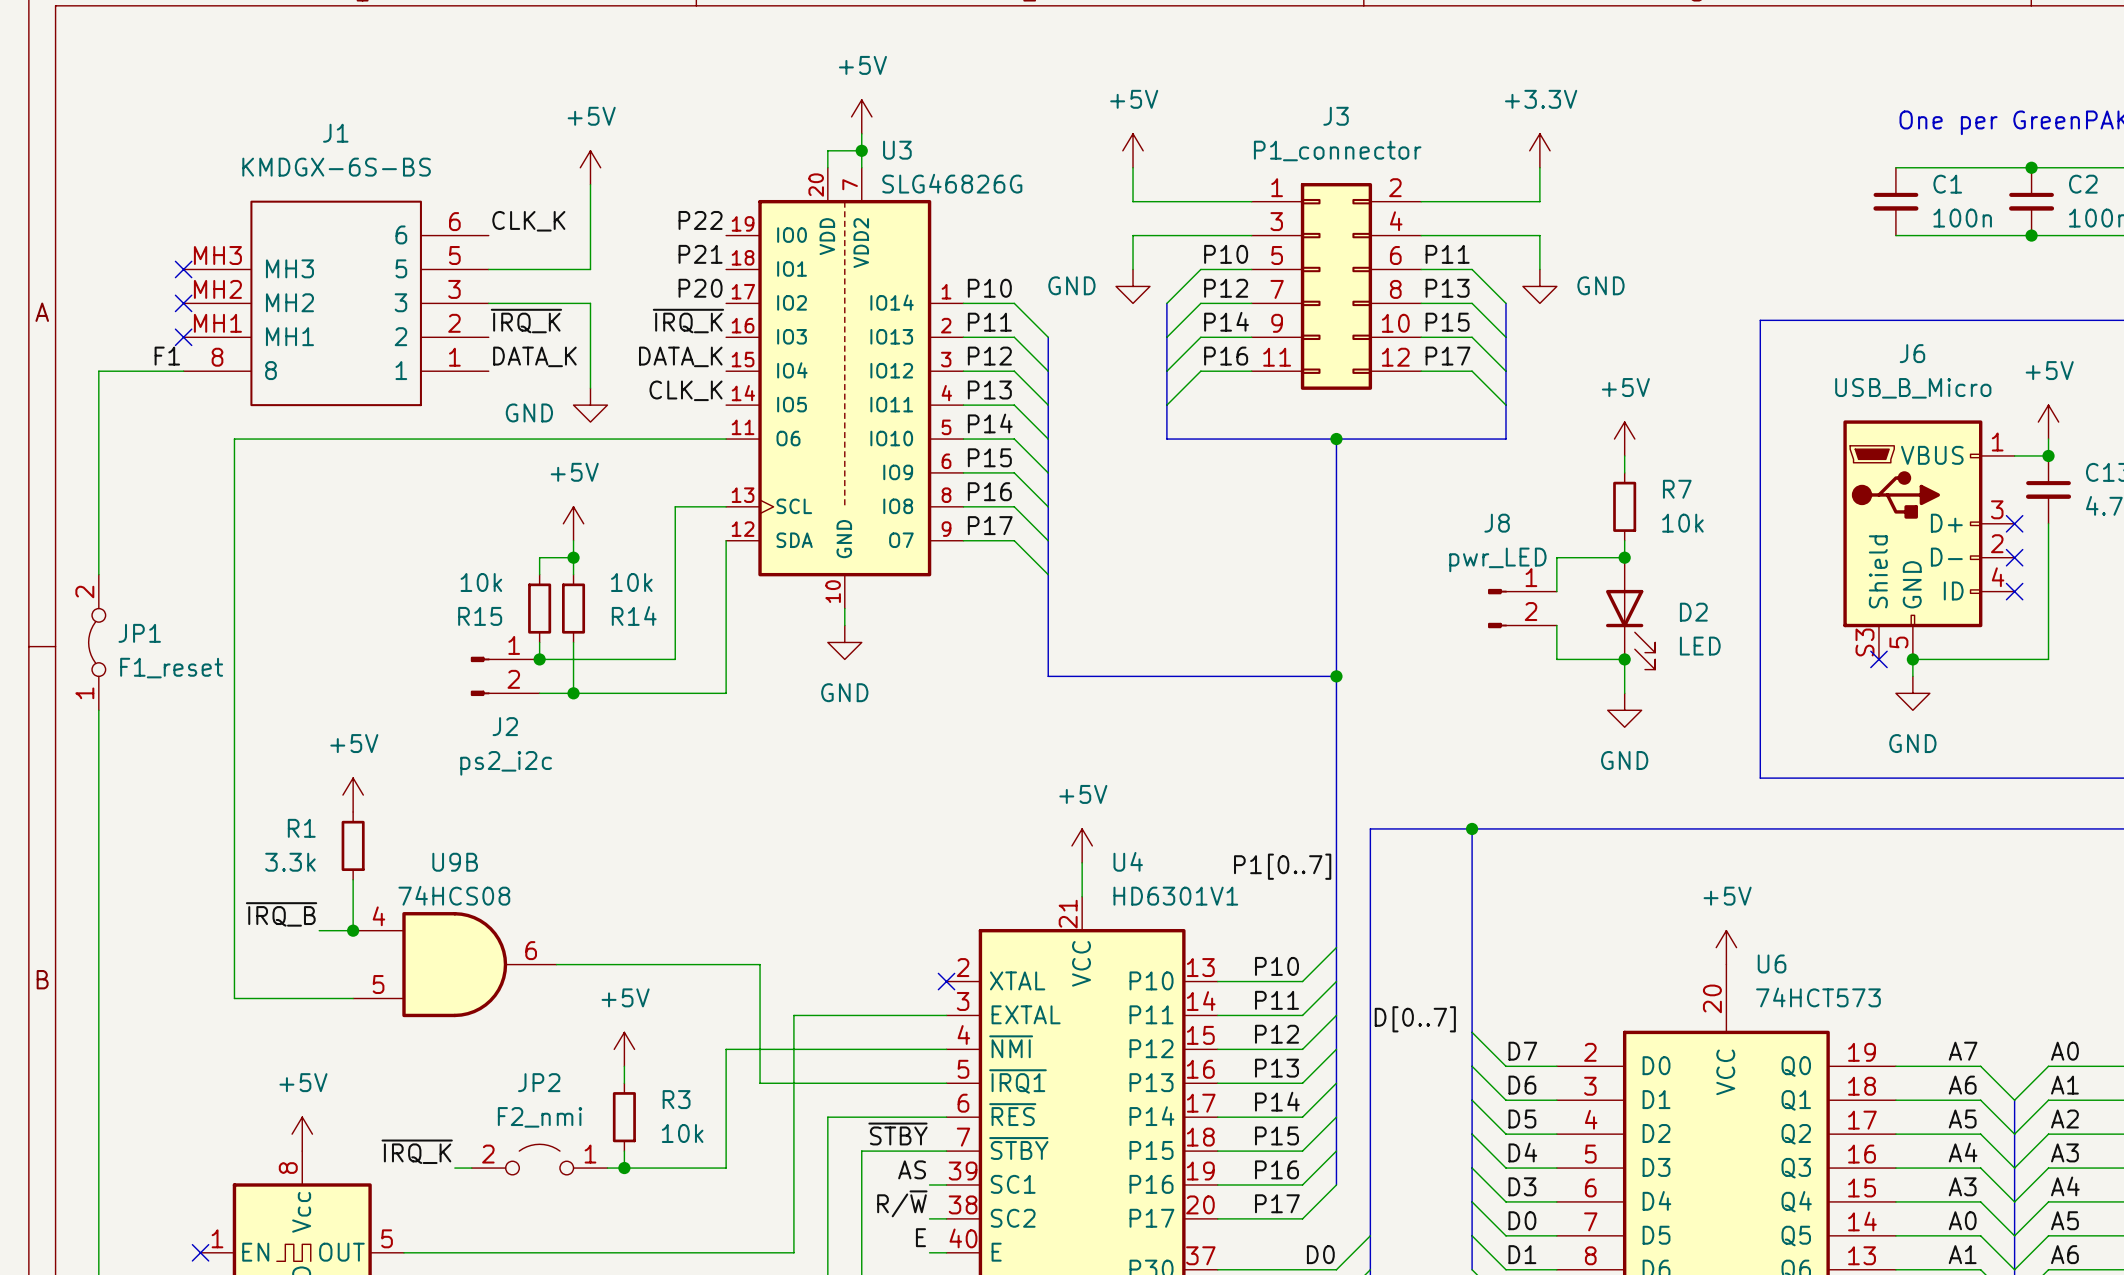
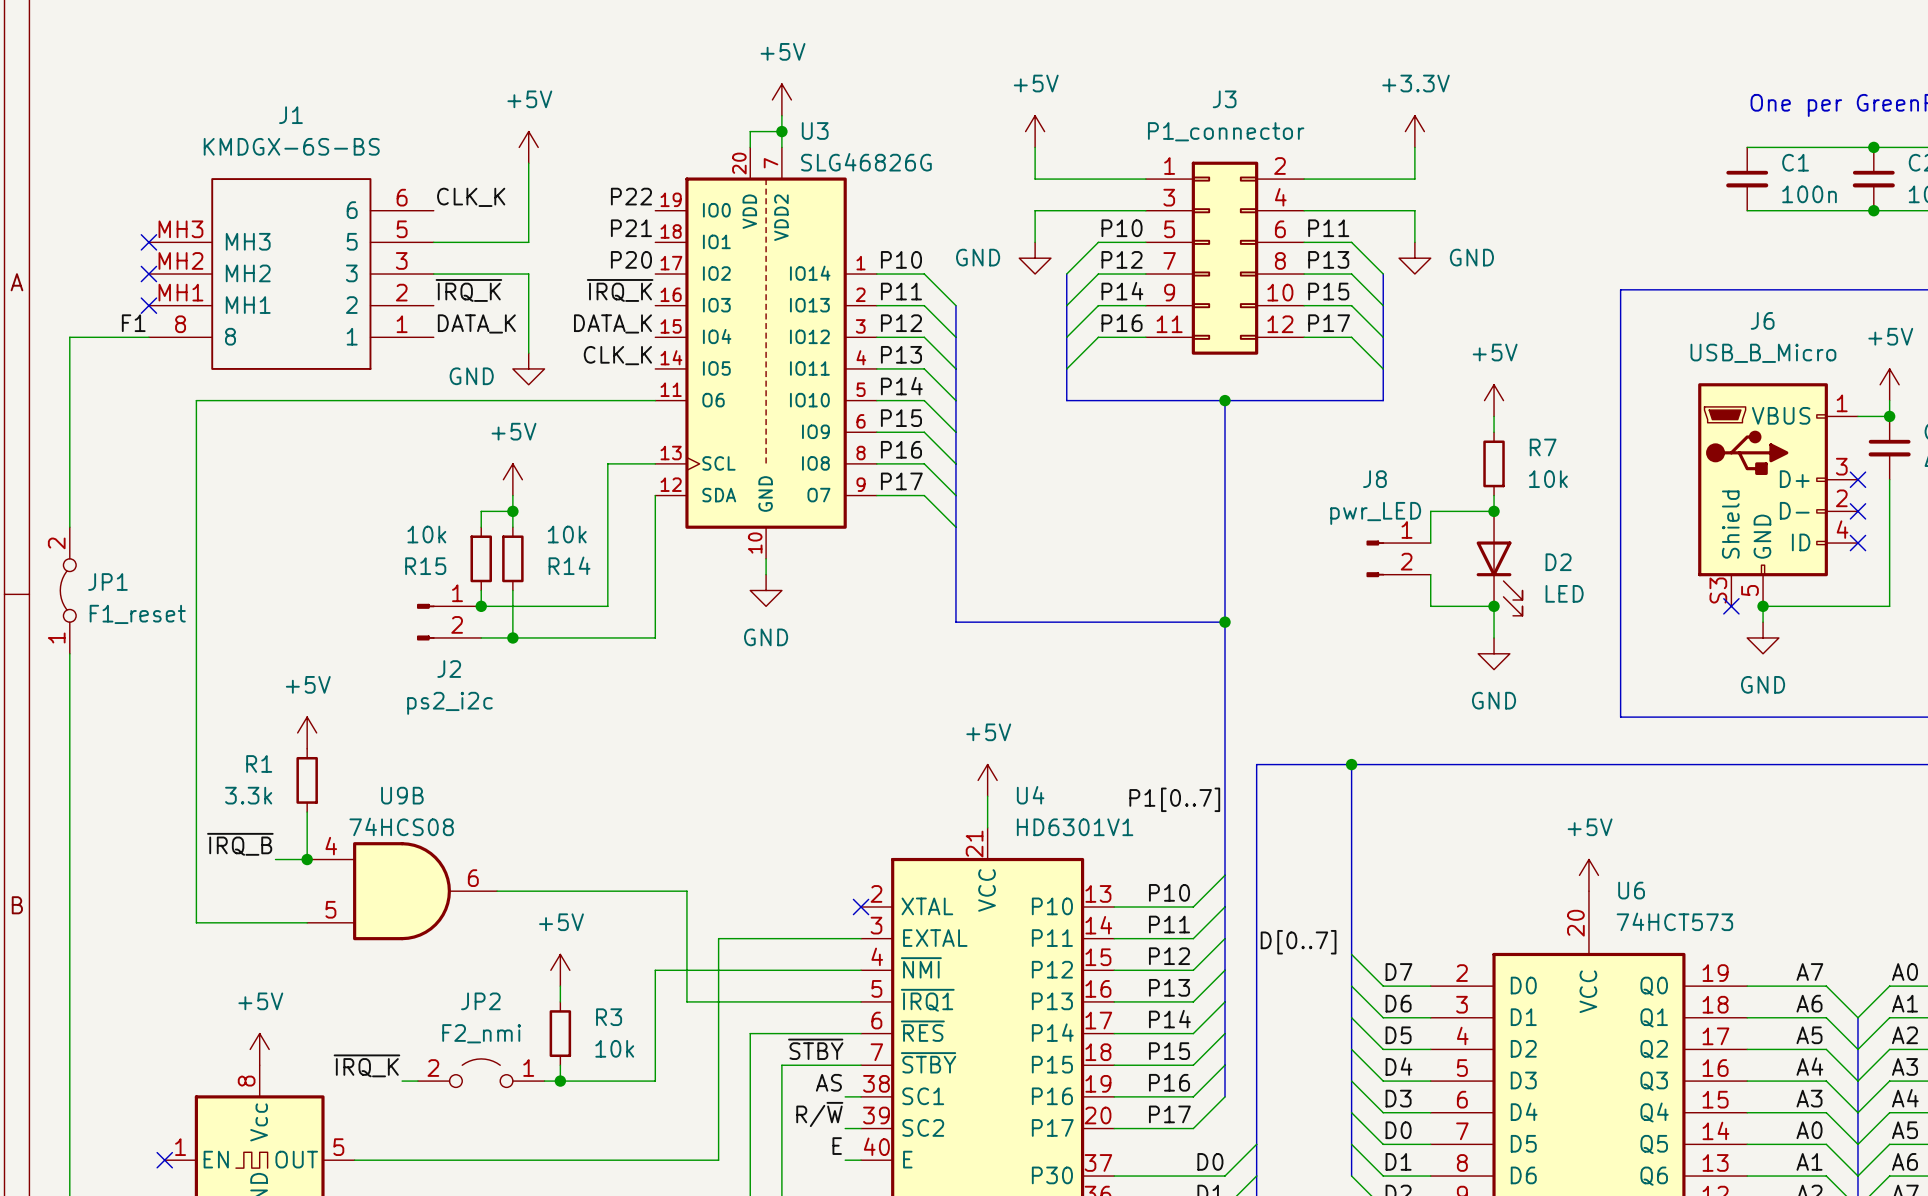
U4 pin number: 39 (963, 1171) -> 38 (876, 1083)
U4 pin number: 38 (963, 1204) -> 39 (876, 1115)

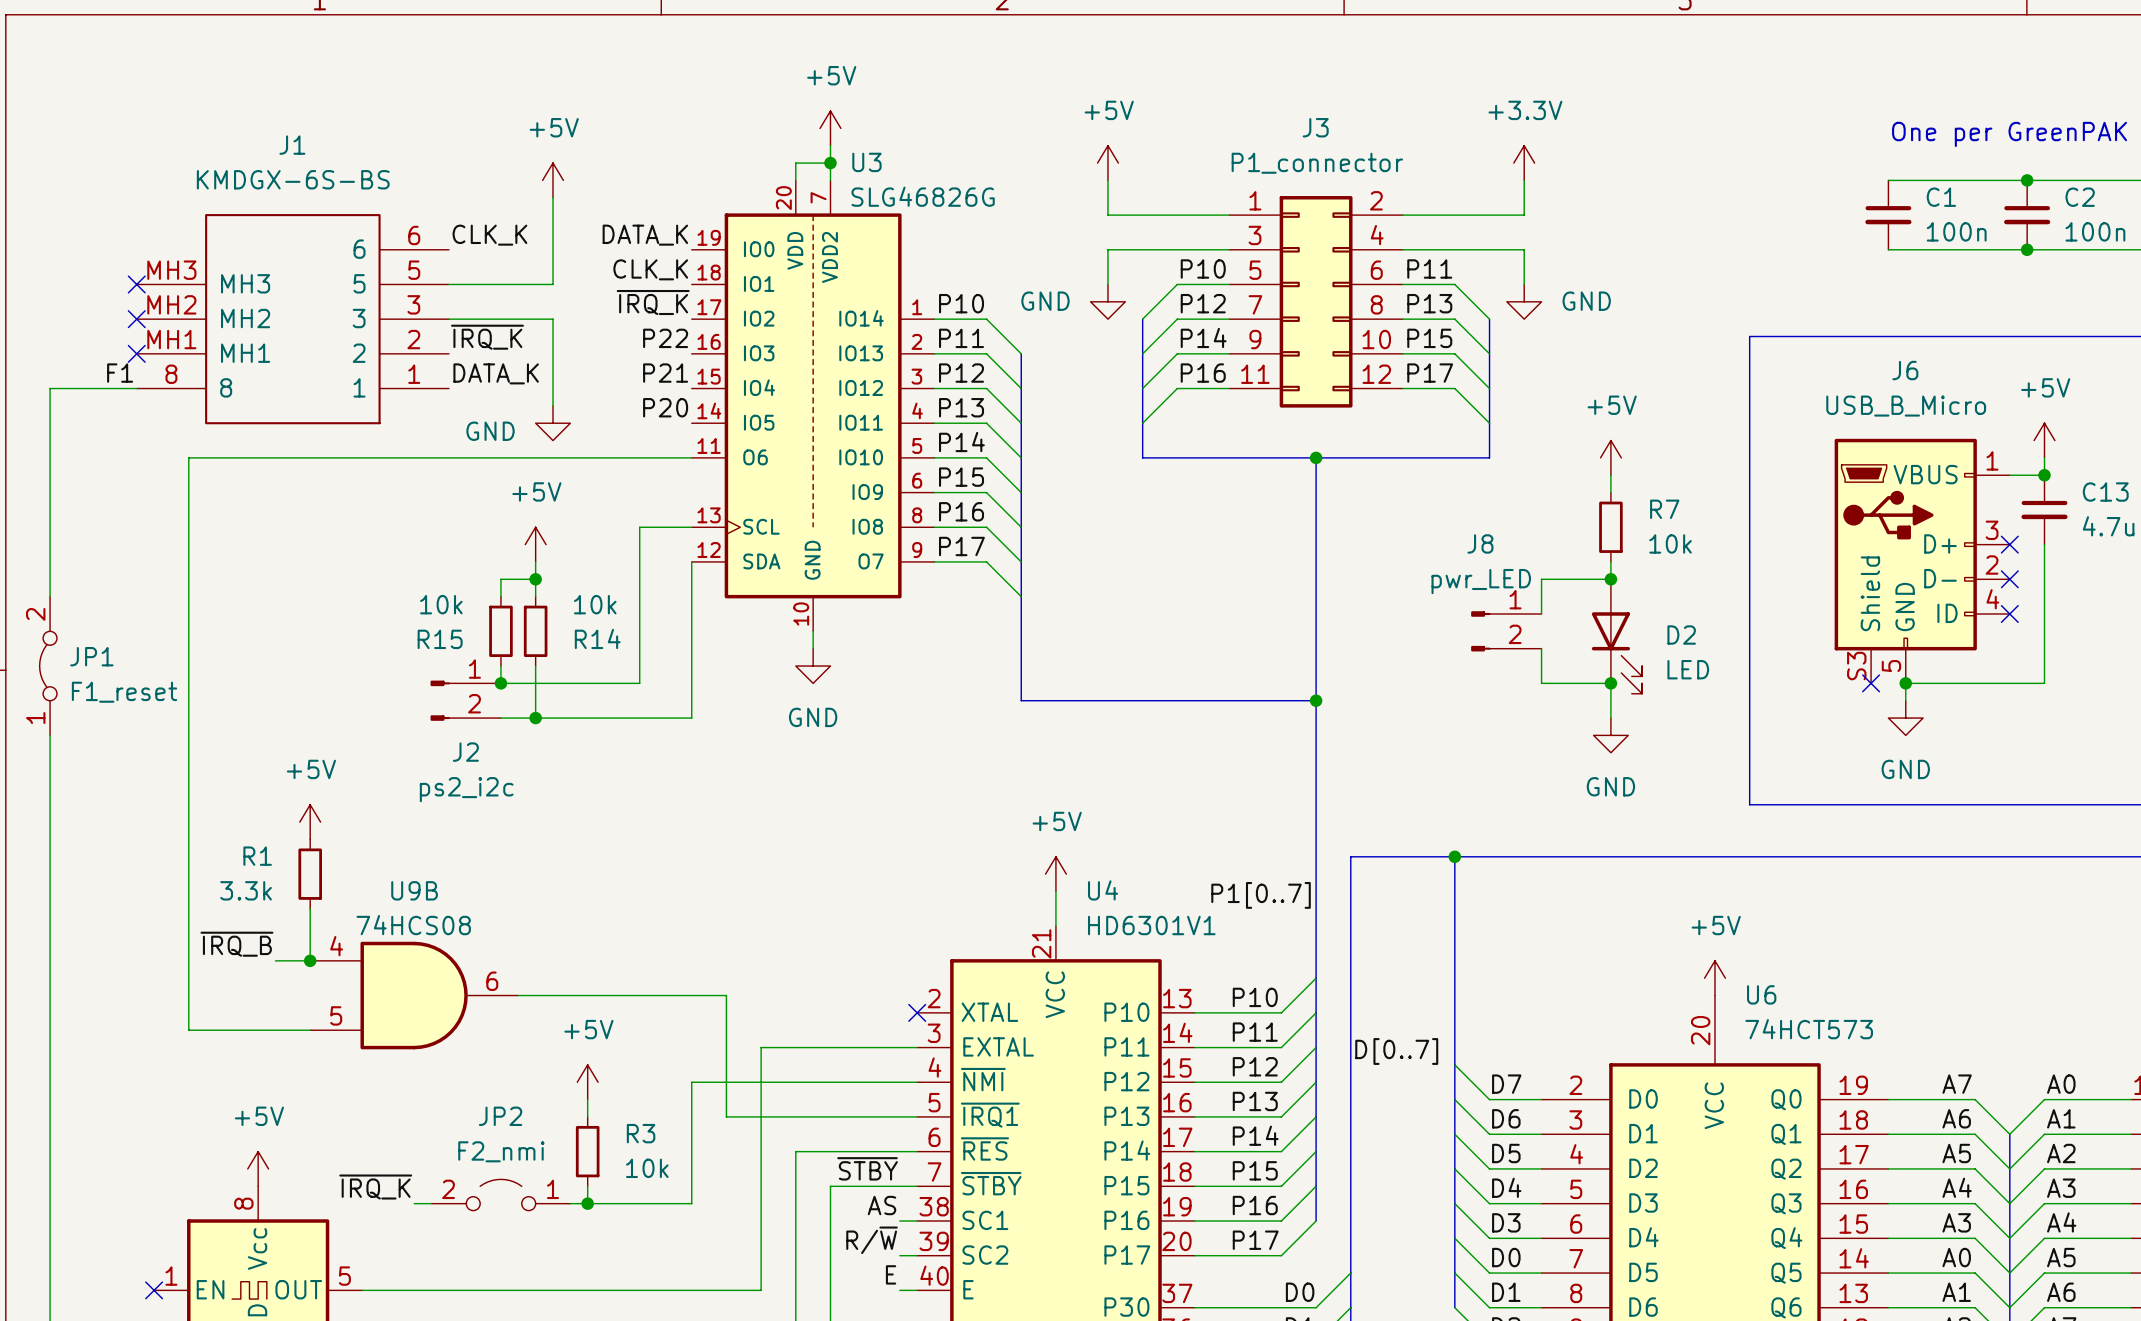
label: P22 (631, 196) -> DATA_K (645, 235)
label: P21 (631, 228) -> CLK_K (650, 269)
label: P20 (631, 259) -> ~{IRQ_K} (653, 302)
label: ~{IRQ_K} (620, 290) -> P22 (665, 338)
label: DATA_K (612, 323) -> P21 (665, 373)
label: CLK_K (617, 355) -> P20 (665, 407)

